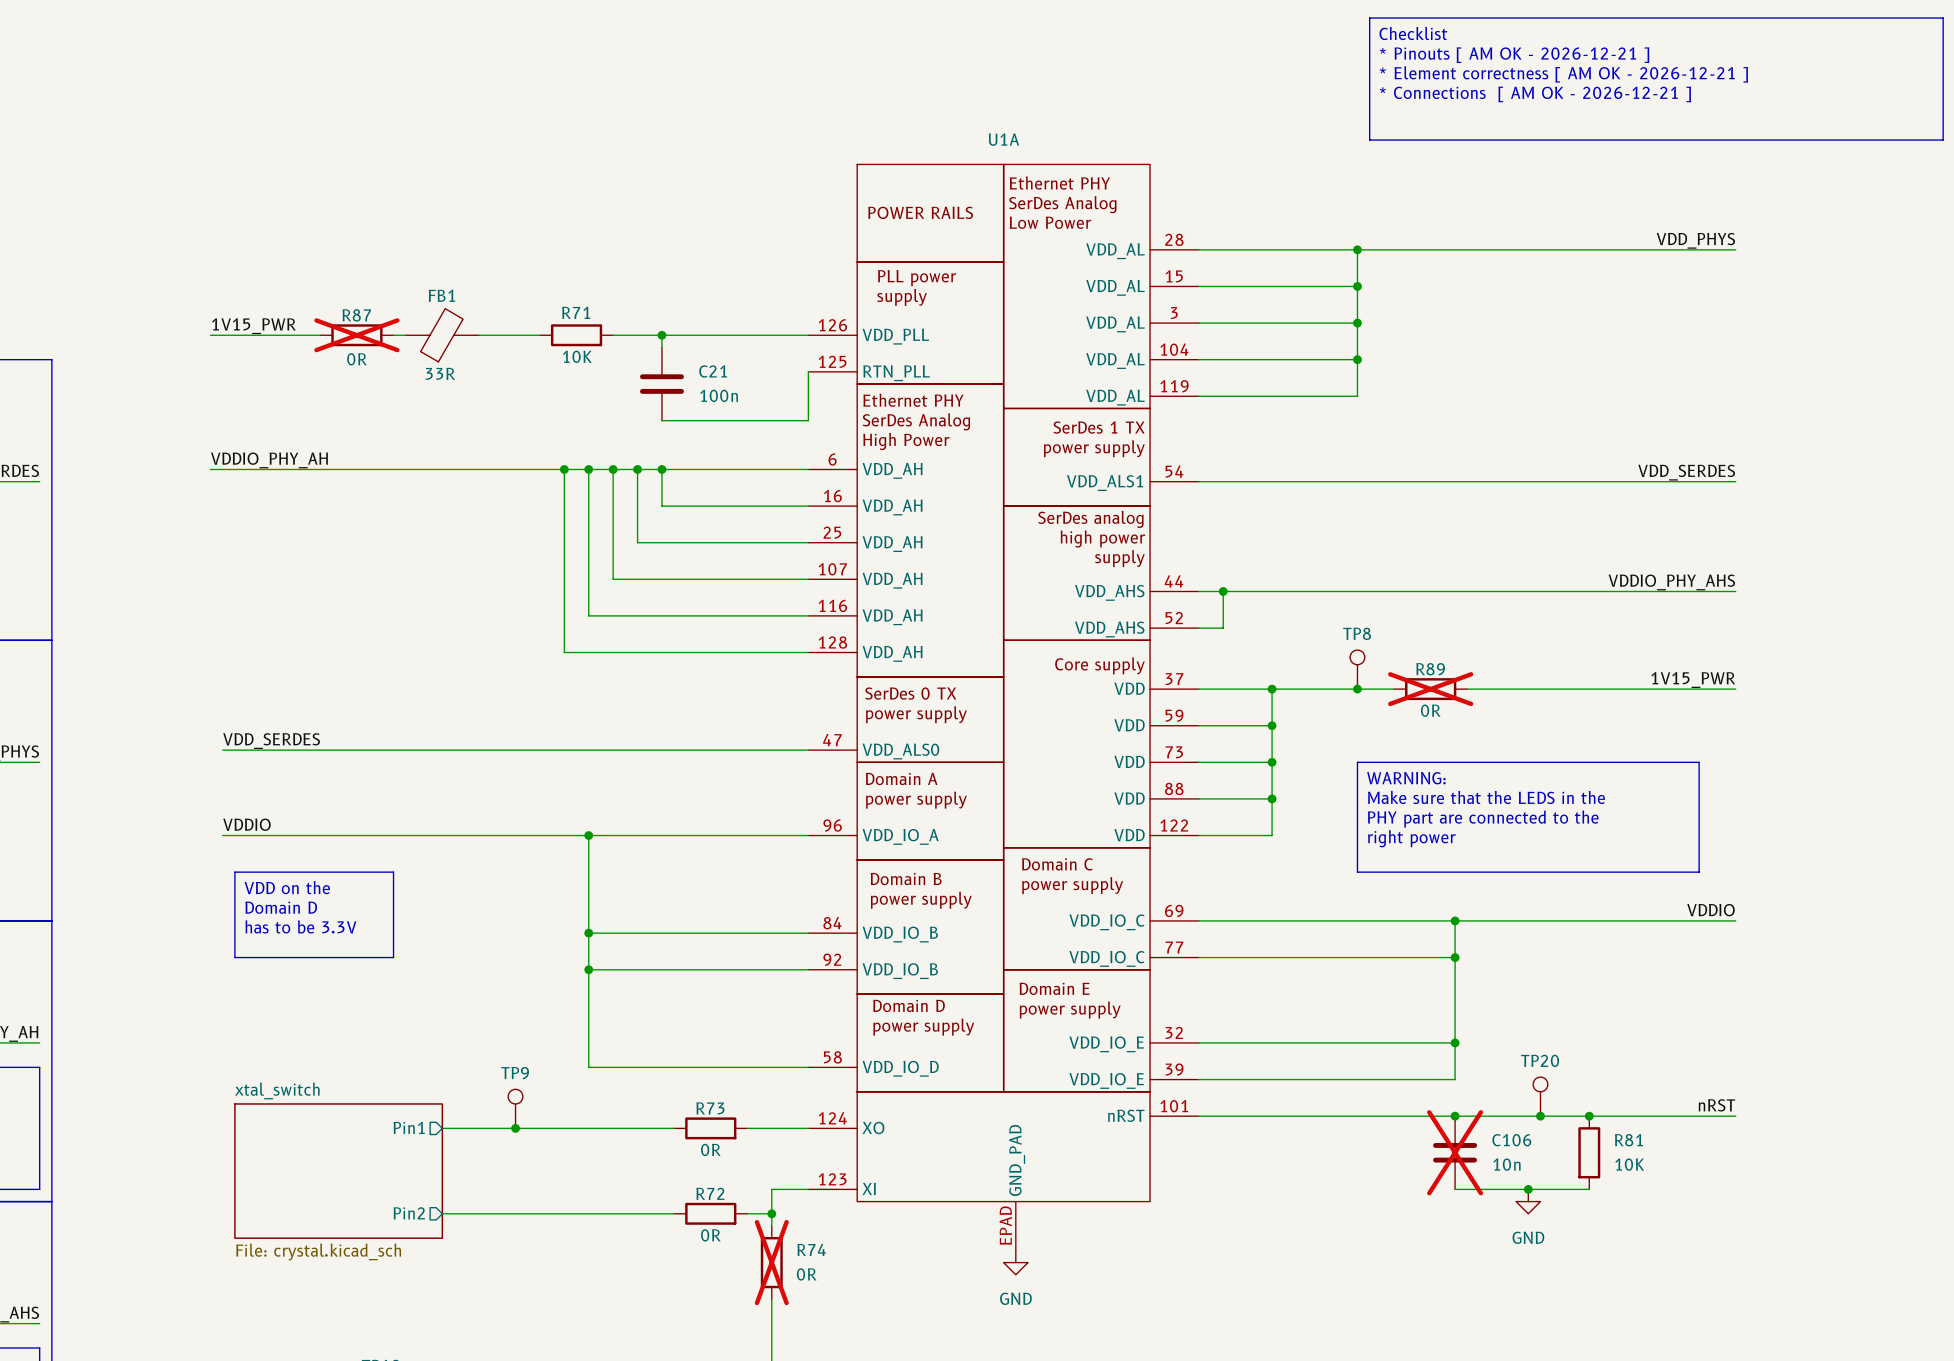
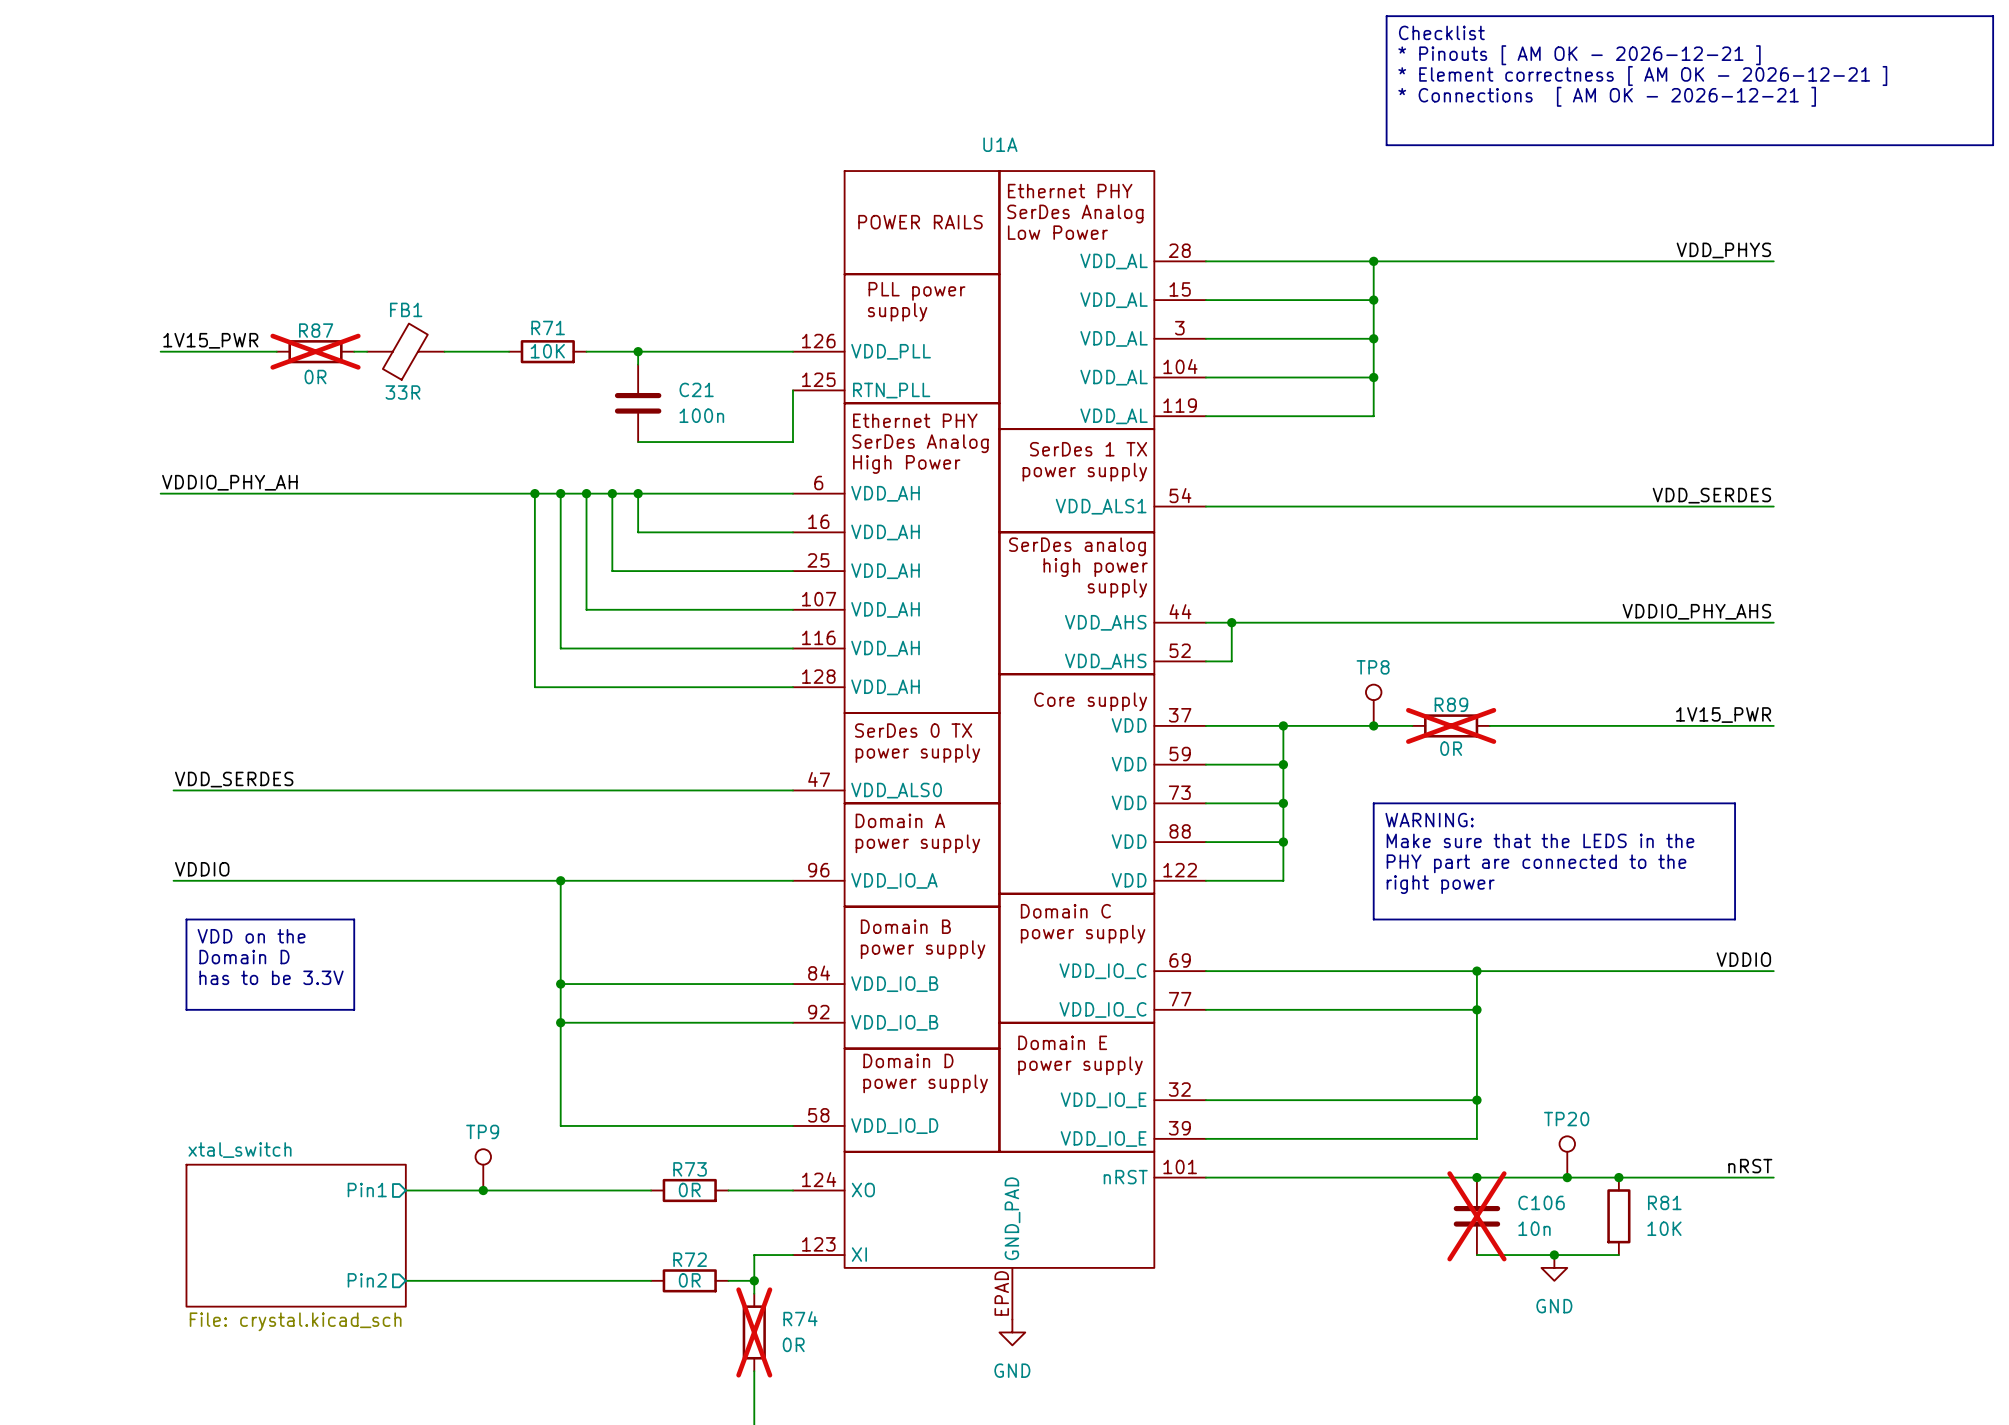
R71 value position: 10K (577, 356) -> 10K (547, 351)
R73 value position: 0R (710, 1149) -> 0R (689, 1190)
R72 value position: 0R (710, 1235) -> 0R (689, 1280)

